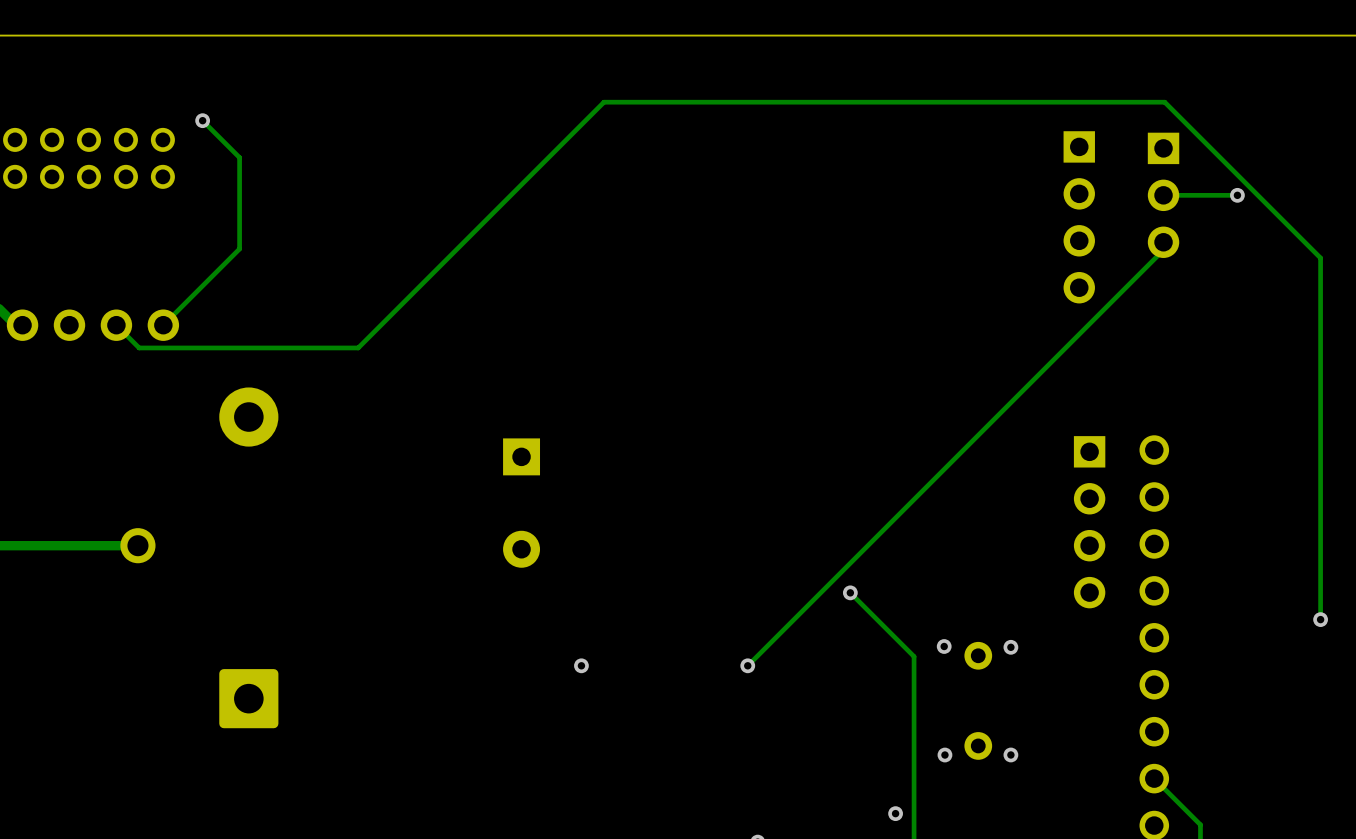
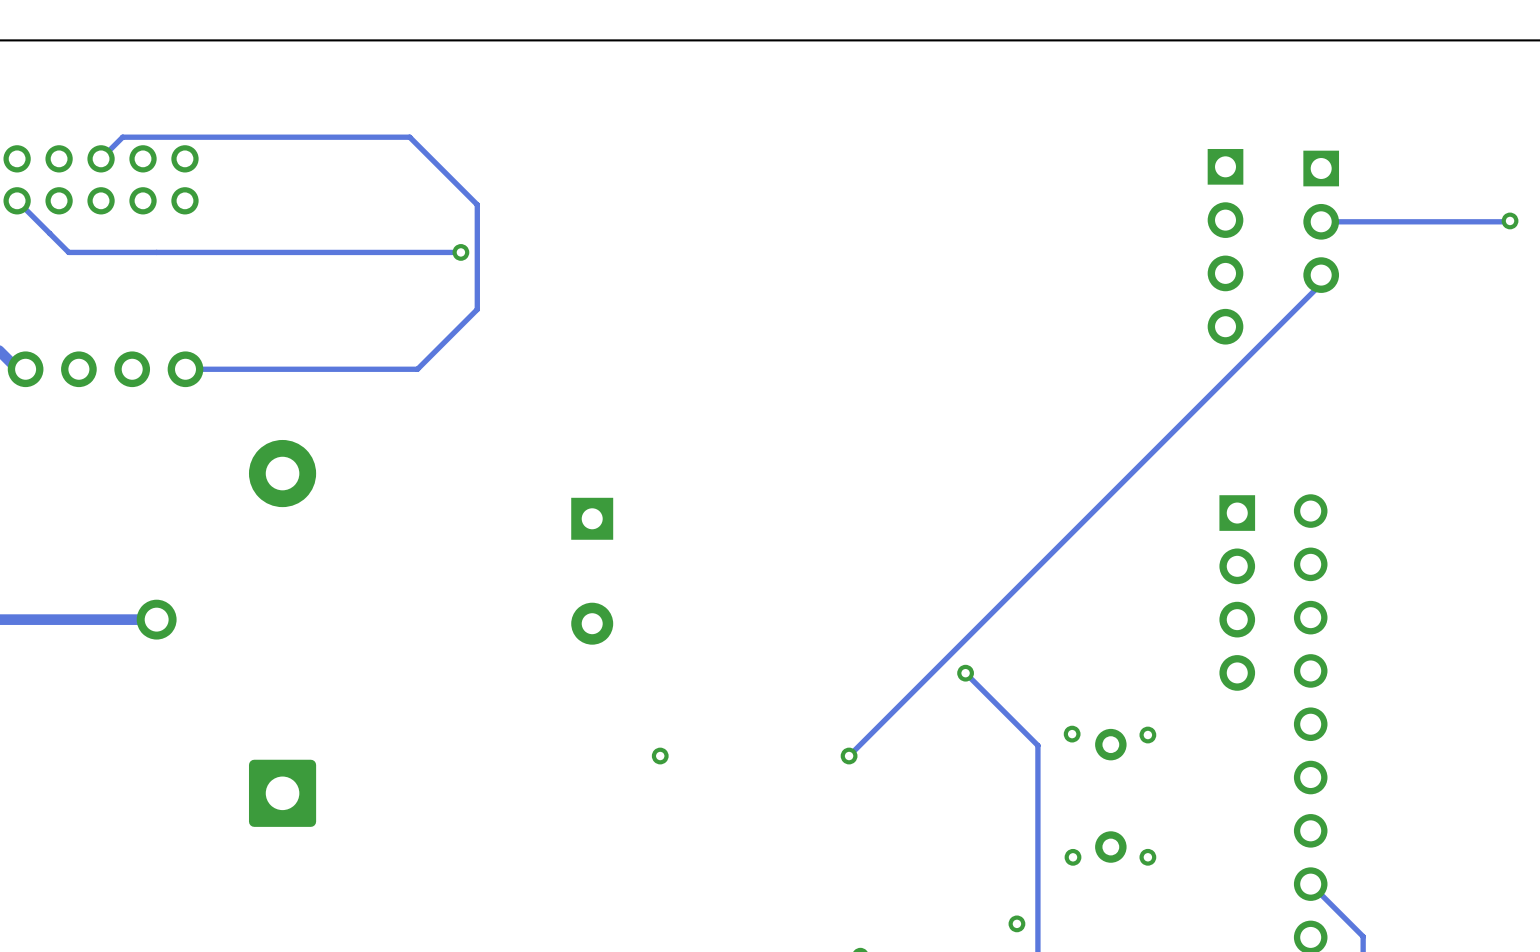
track: (202, 120) (239, 157) (239, 248) (163, 325) -> (101, 158) (122, 137) (409, 137) (477, 204) (477, 309) (417, 369) (185, 369)
via: (202, 120) -> none
track: none -> (17, 200) (68, 252) (460, 252)
track: none -> (1510, 220) (1405, 221)
via position: (1237, 195) -> (1510, 220)
via: none -> (460, 252)
track: (116, 325) (139, 347) (358, 347) (603, 102) (1164, 102) (1320, 258) (1320, 619) -> none
via: (1320, 619) -> none

